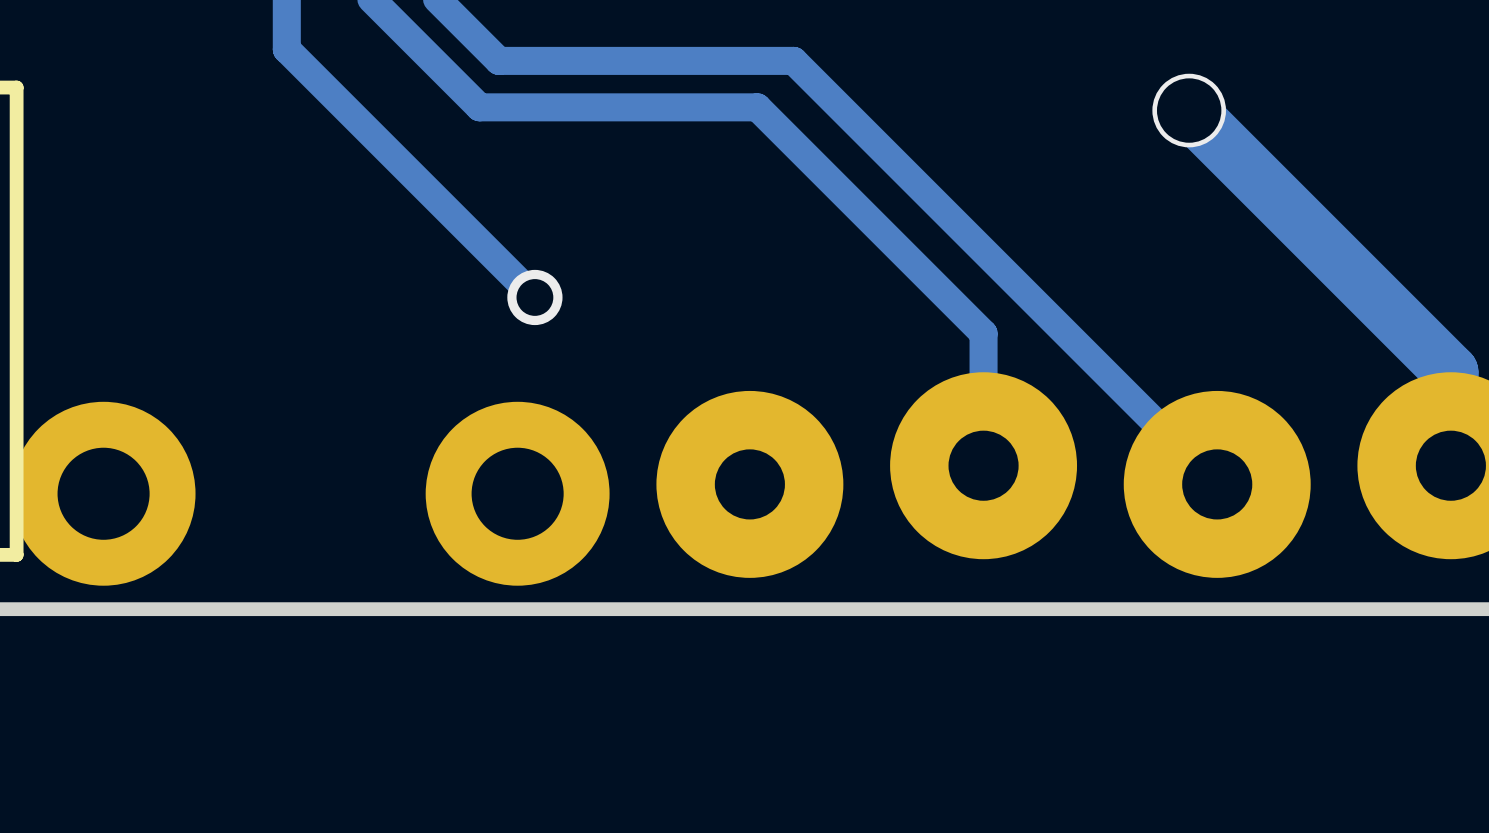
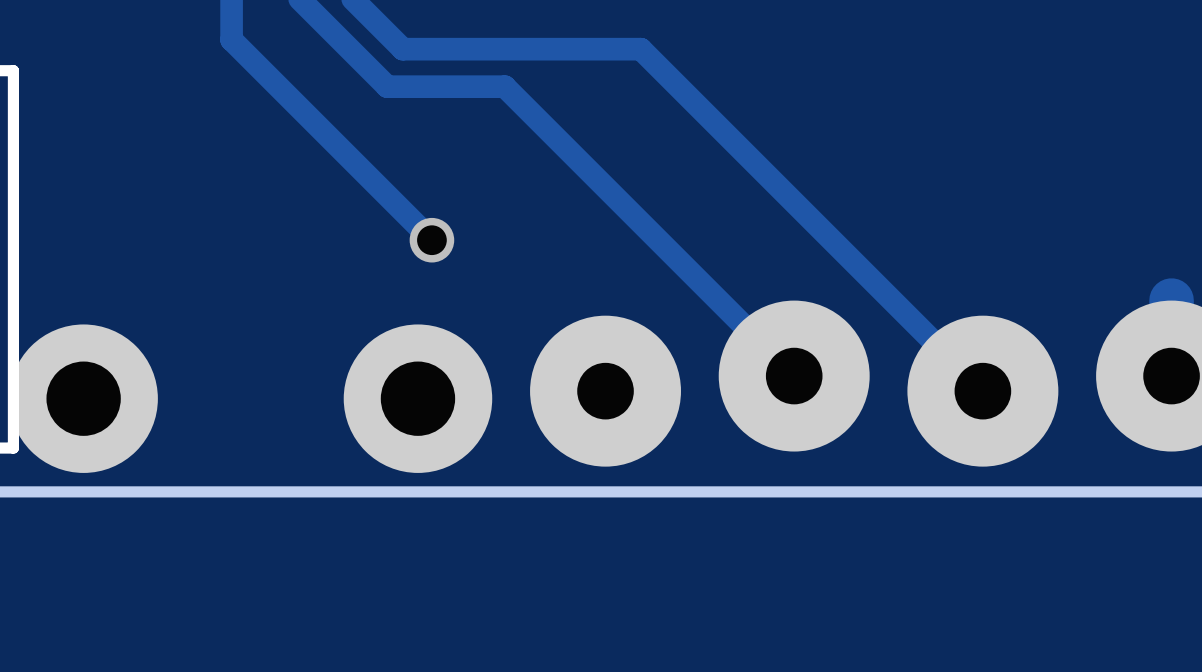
track: (625, 107) (757, 107) (983, 333) (983, 465) -> (504, 86) (794, 376)
track: (1189, 110) (1450, 372) -> none
via: (1189, 110) -> none

